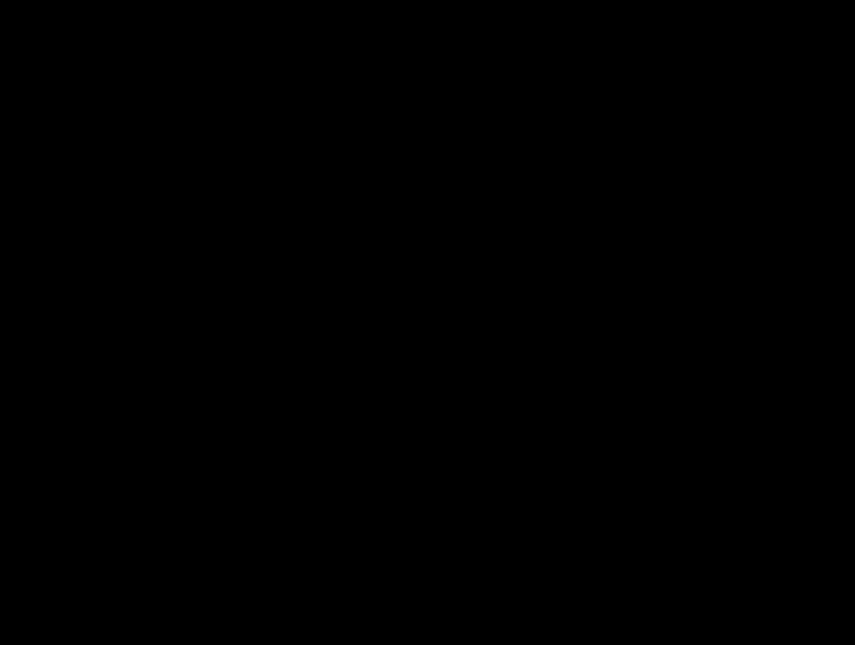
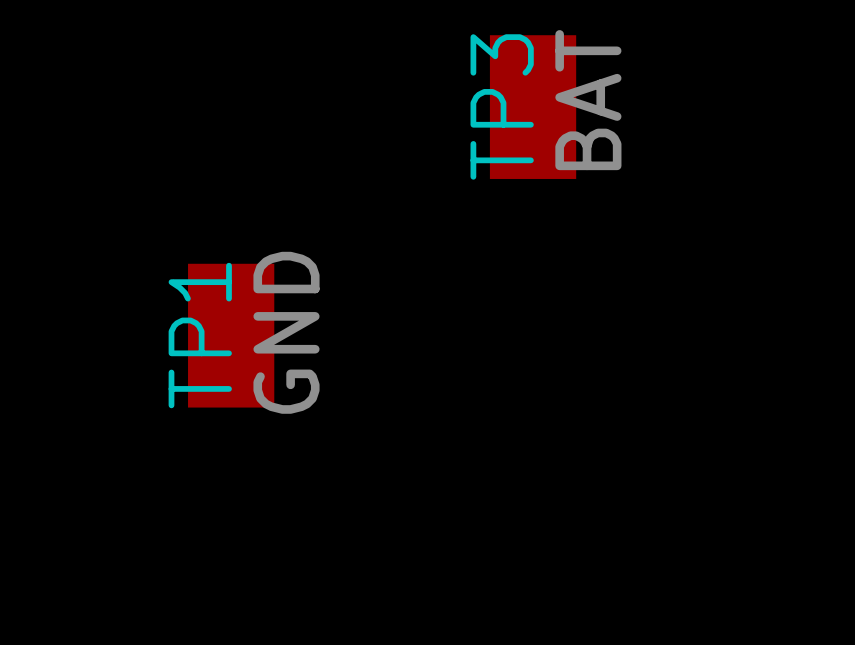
TP3: none -> BAT (533, 107)
TP1: none -> GND (231, 335)

